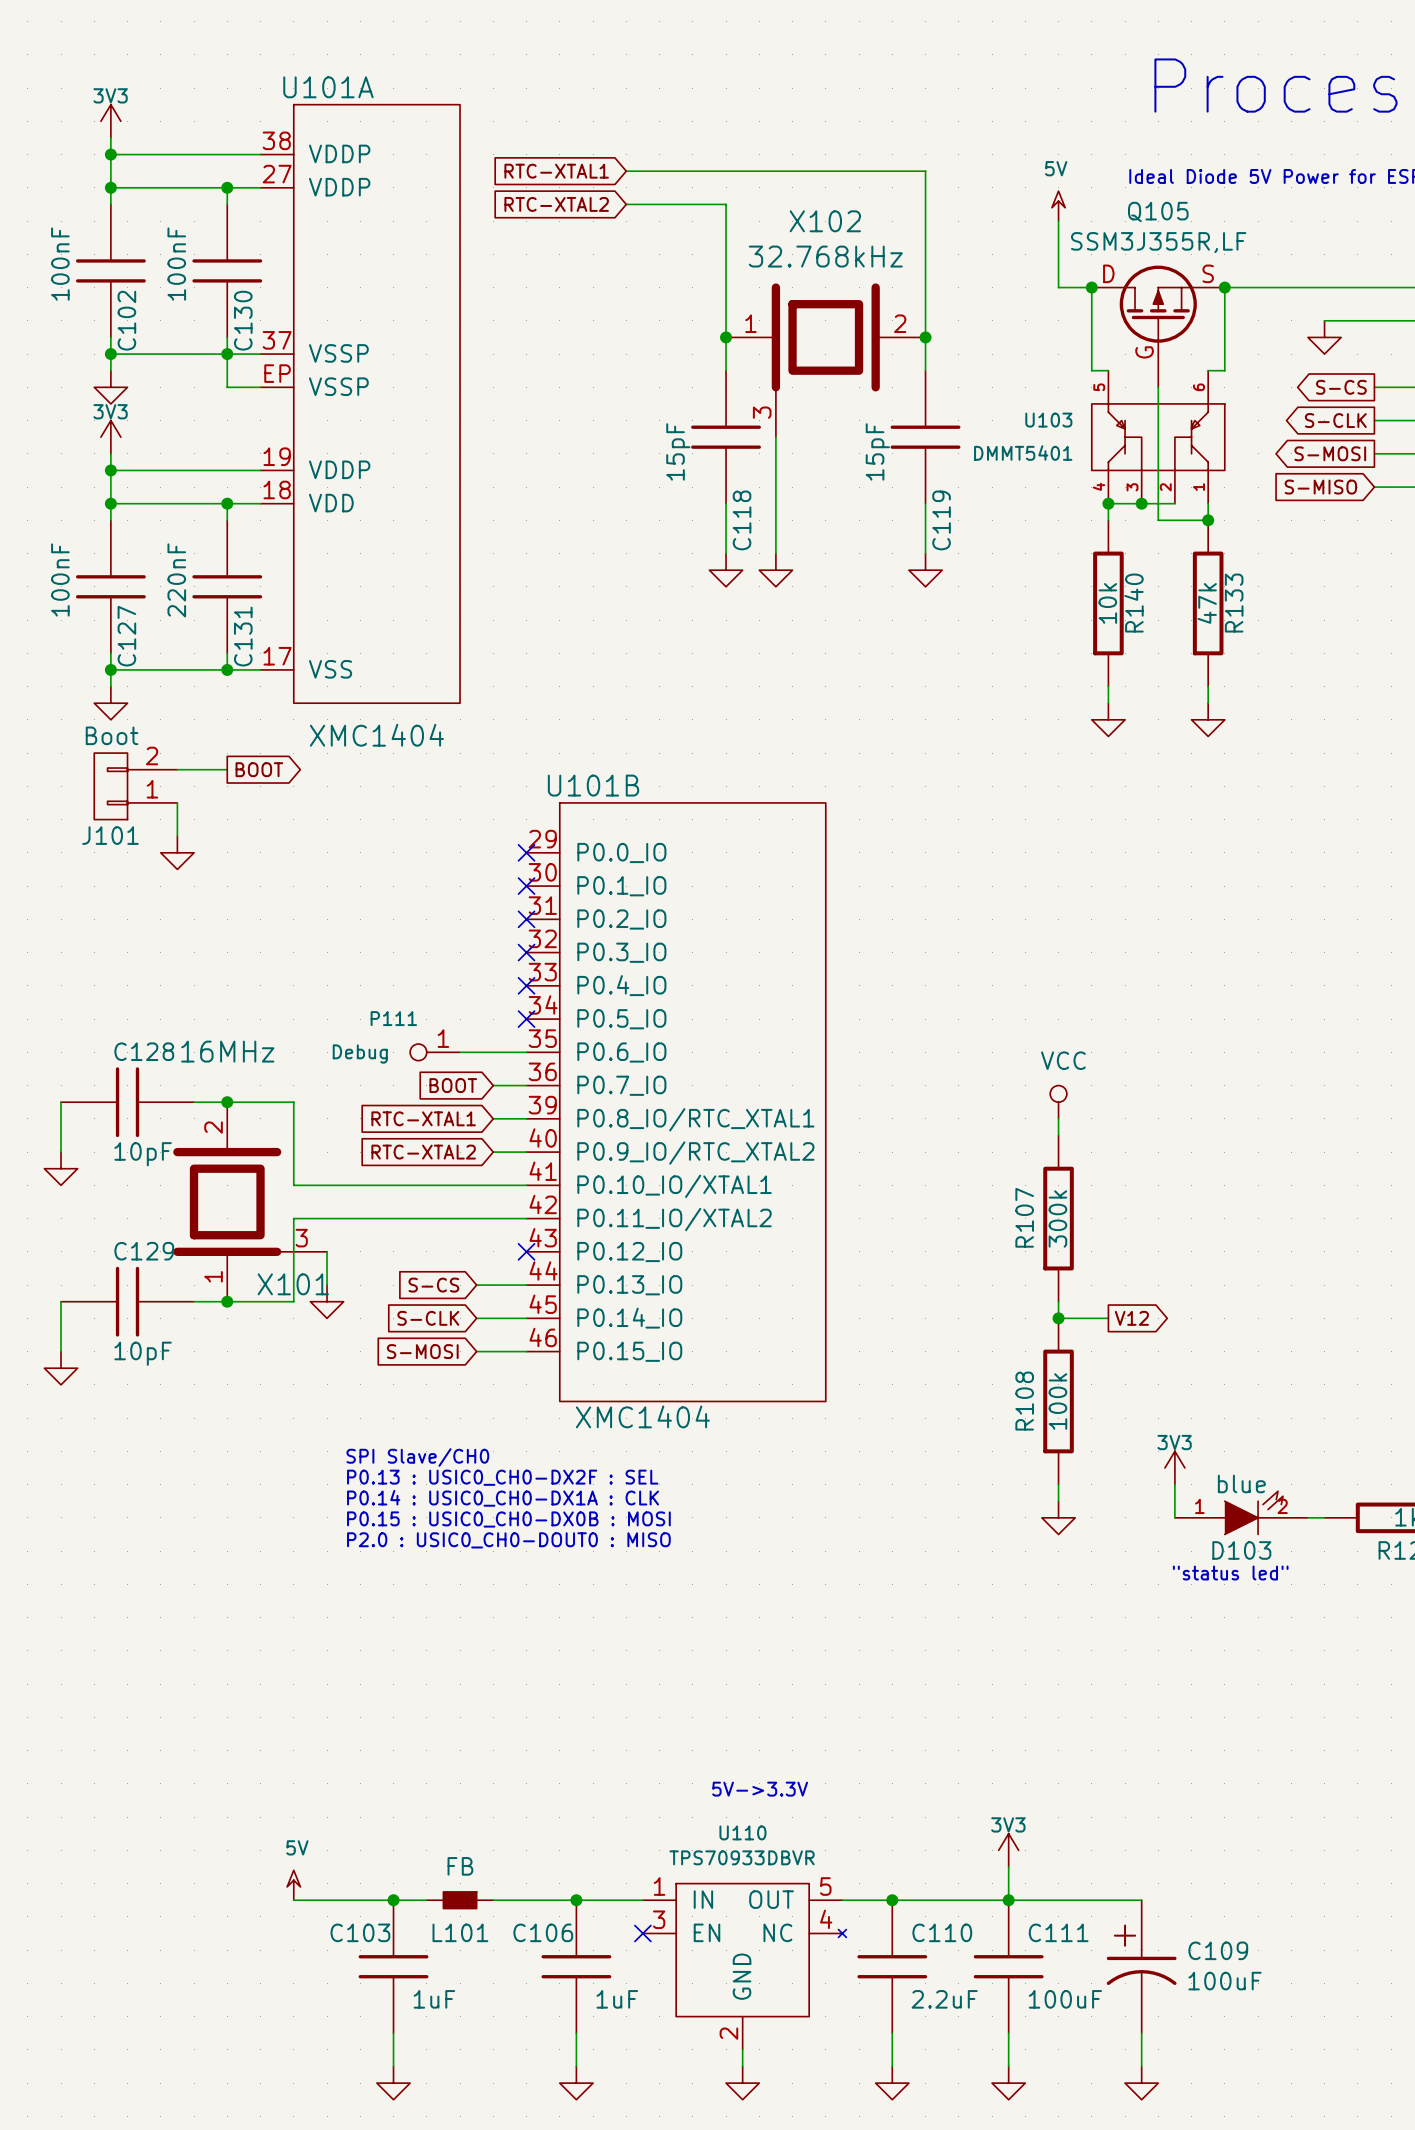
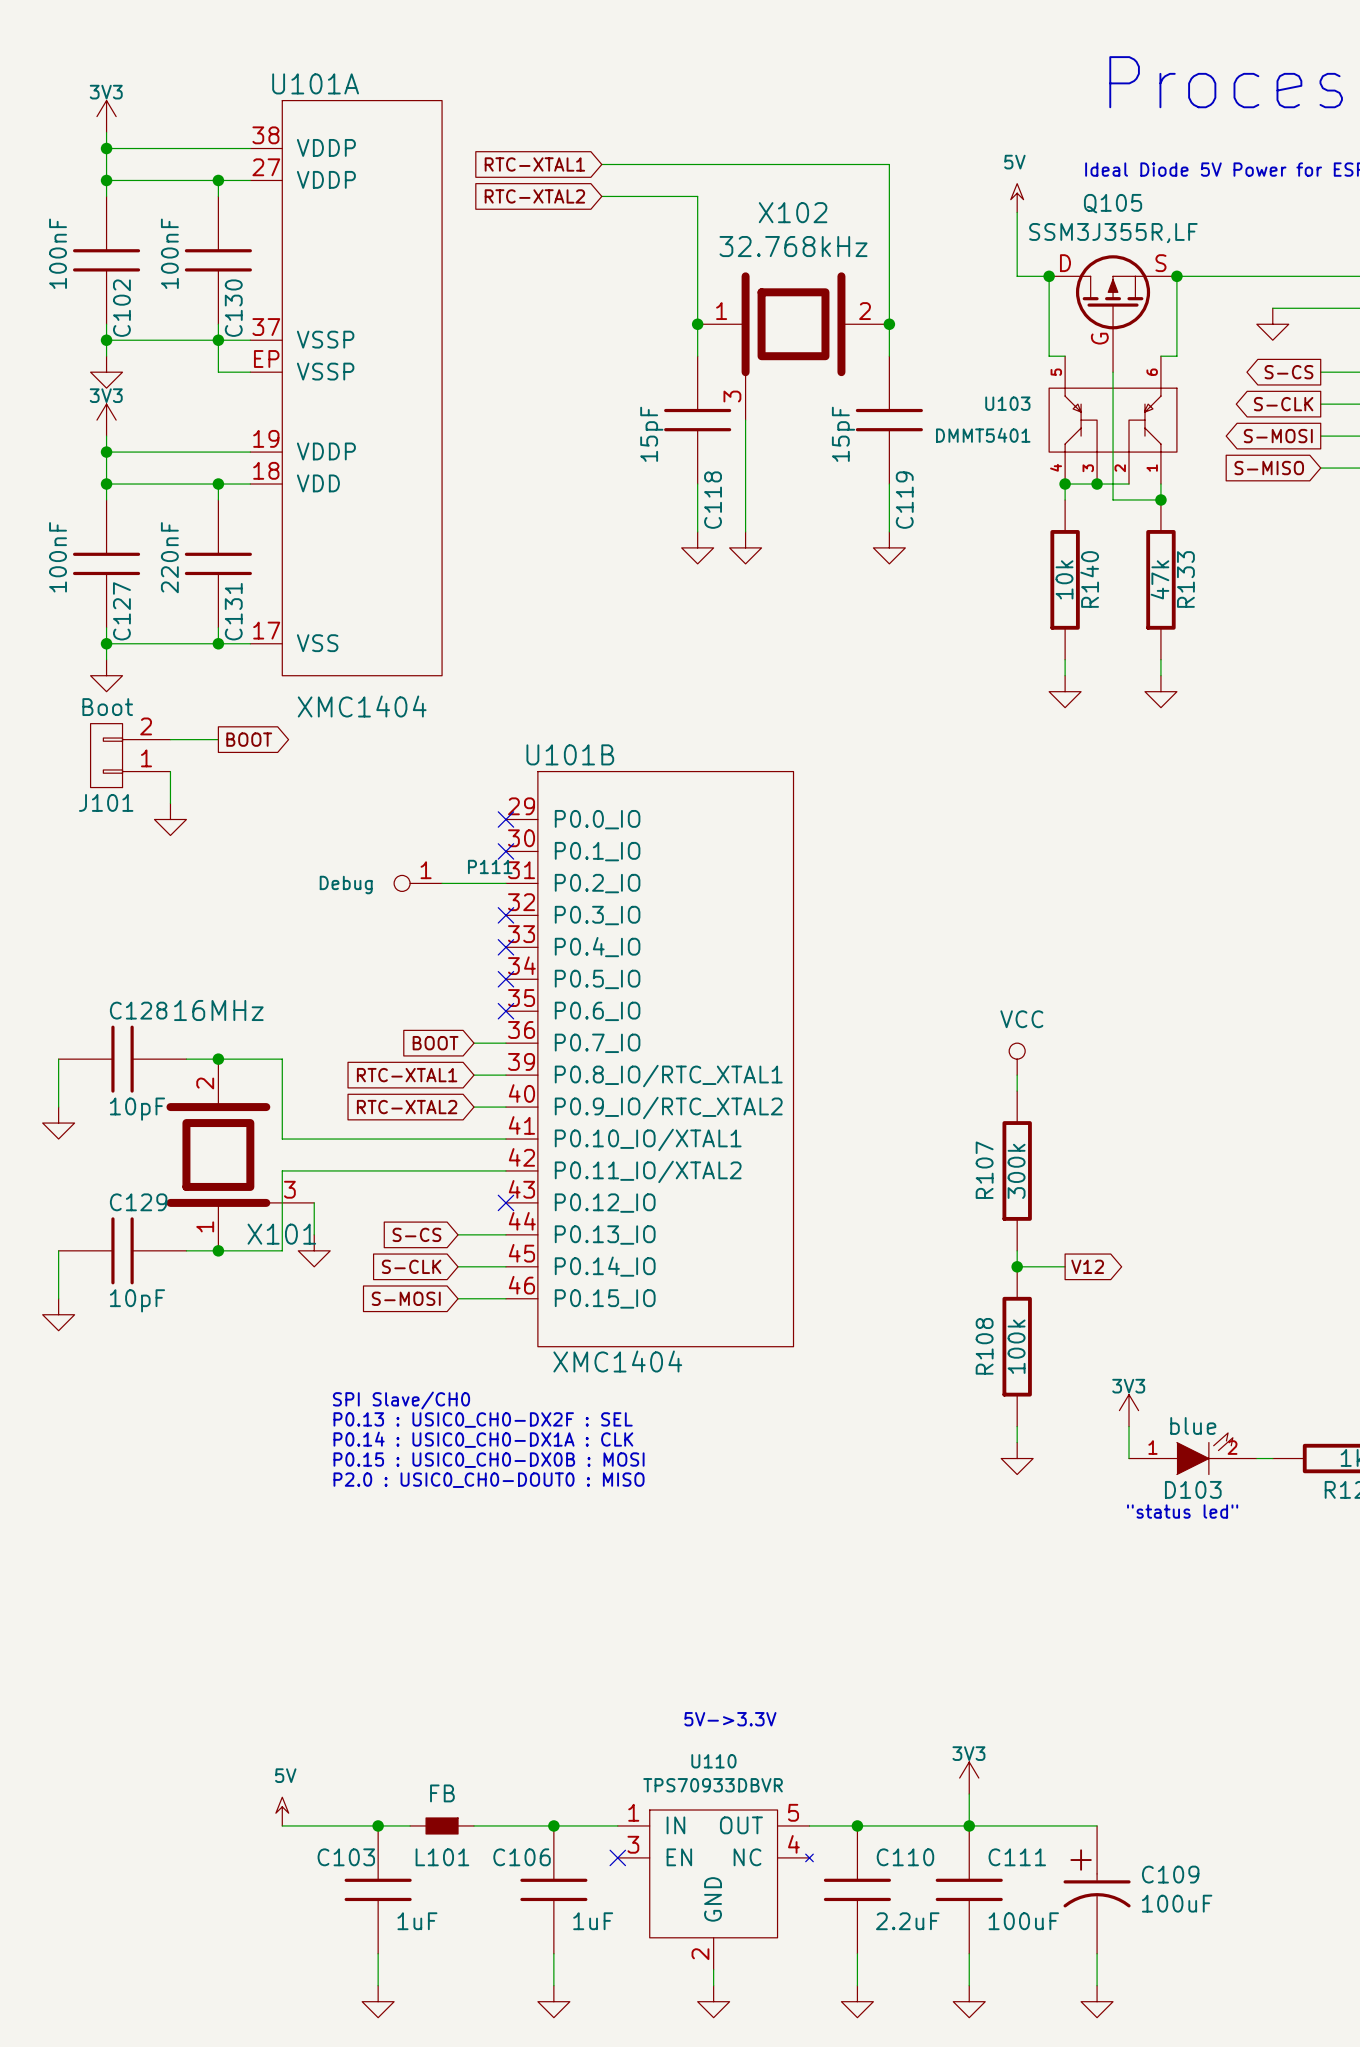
no-connect mark: (526, 919) -> none
P111 name position: P111 (393, 1018) -> P111 (490, 866)
P111 position: (435, 1052) -> (418, 883)
wire: (460, 1052) (526, 1052) -> (442, 883) (505, 883)
no-connect mark: none -> (505, 1011)

